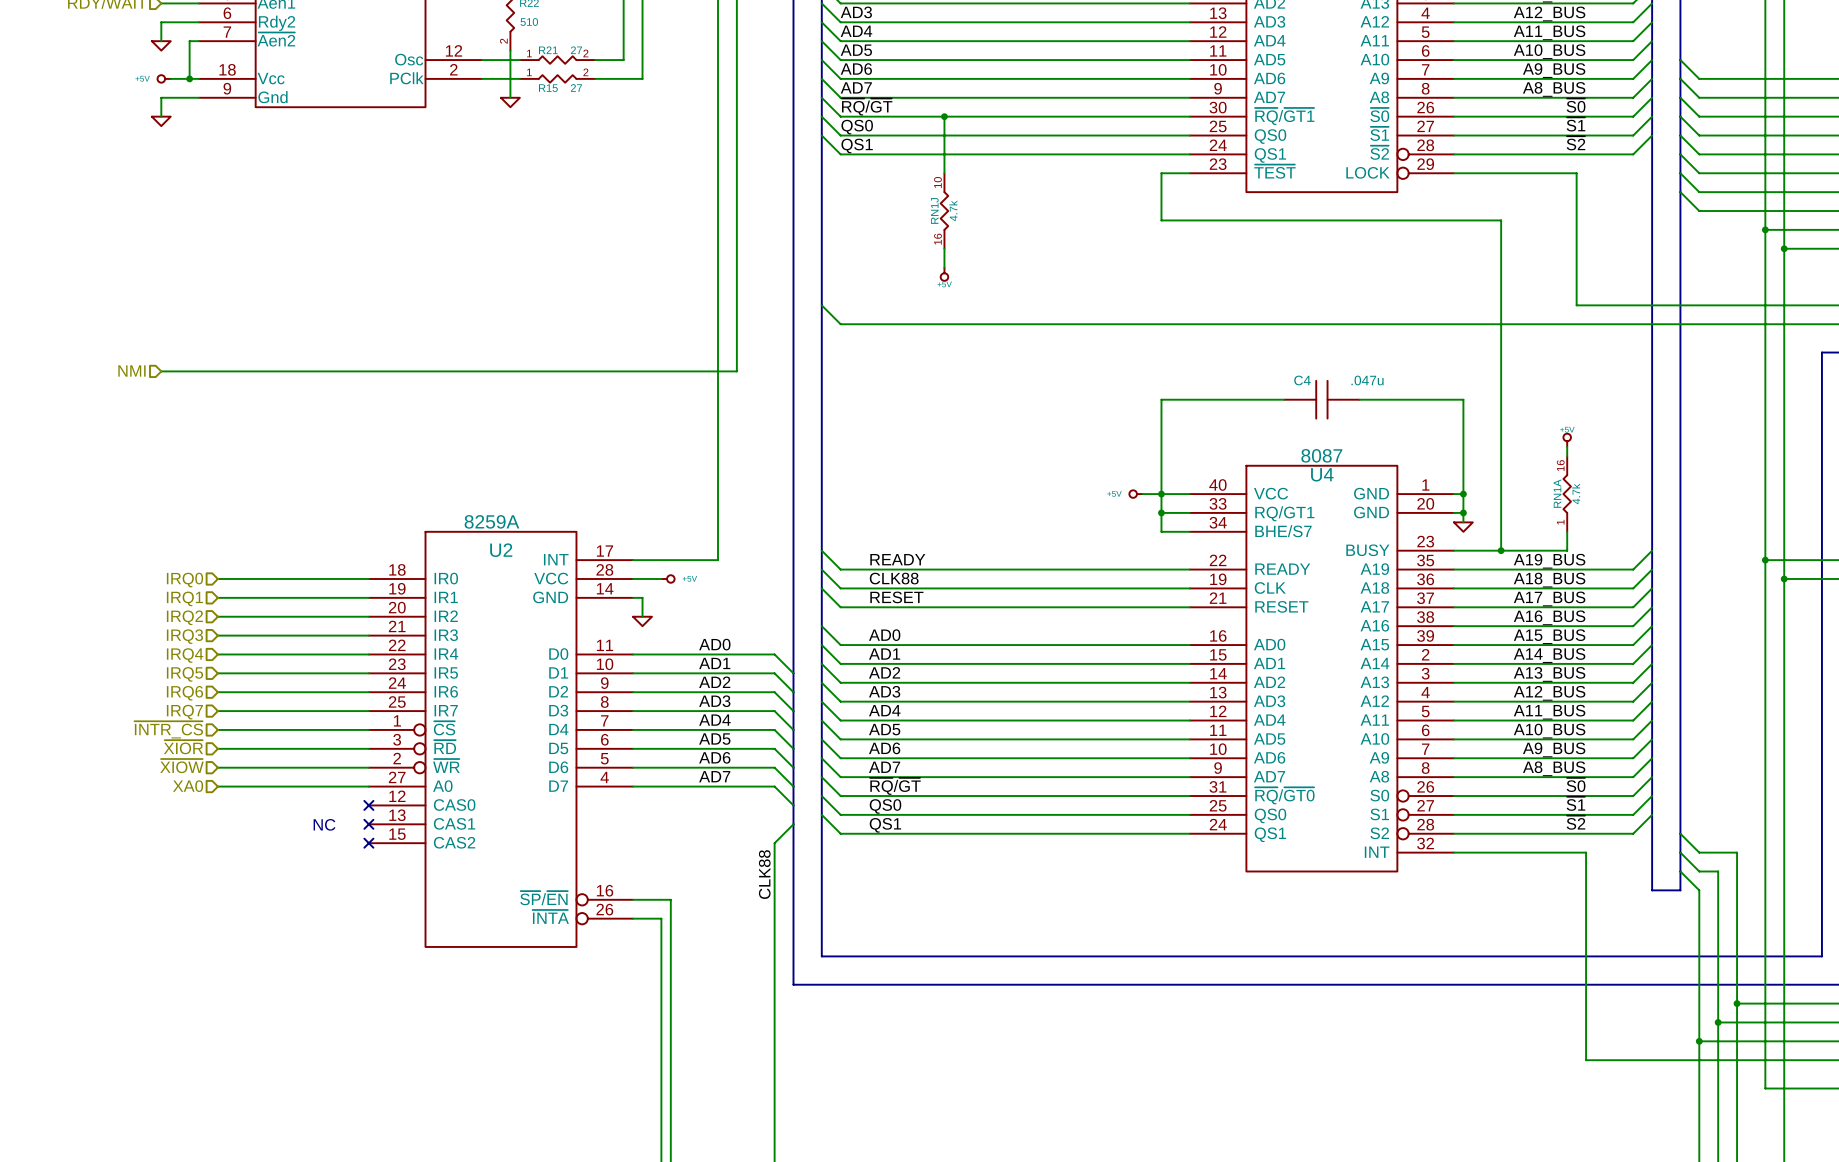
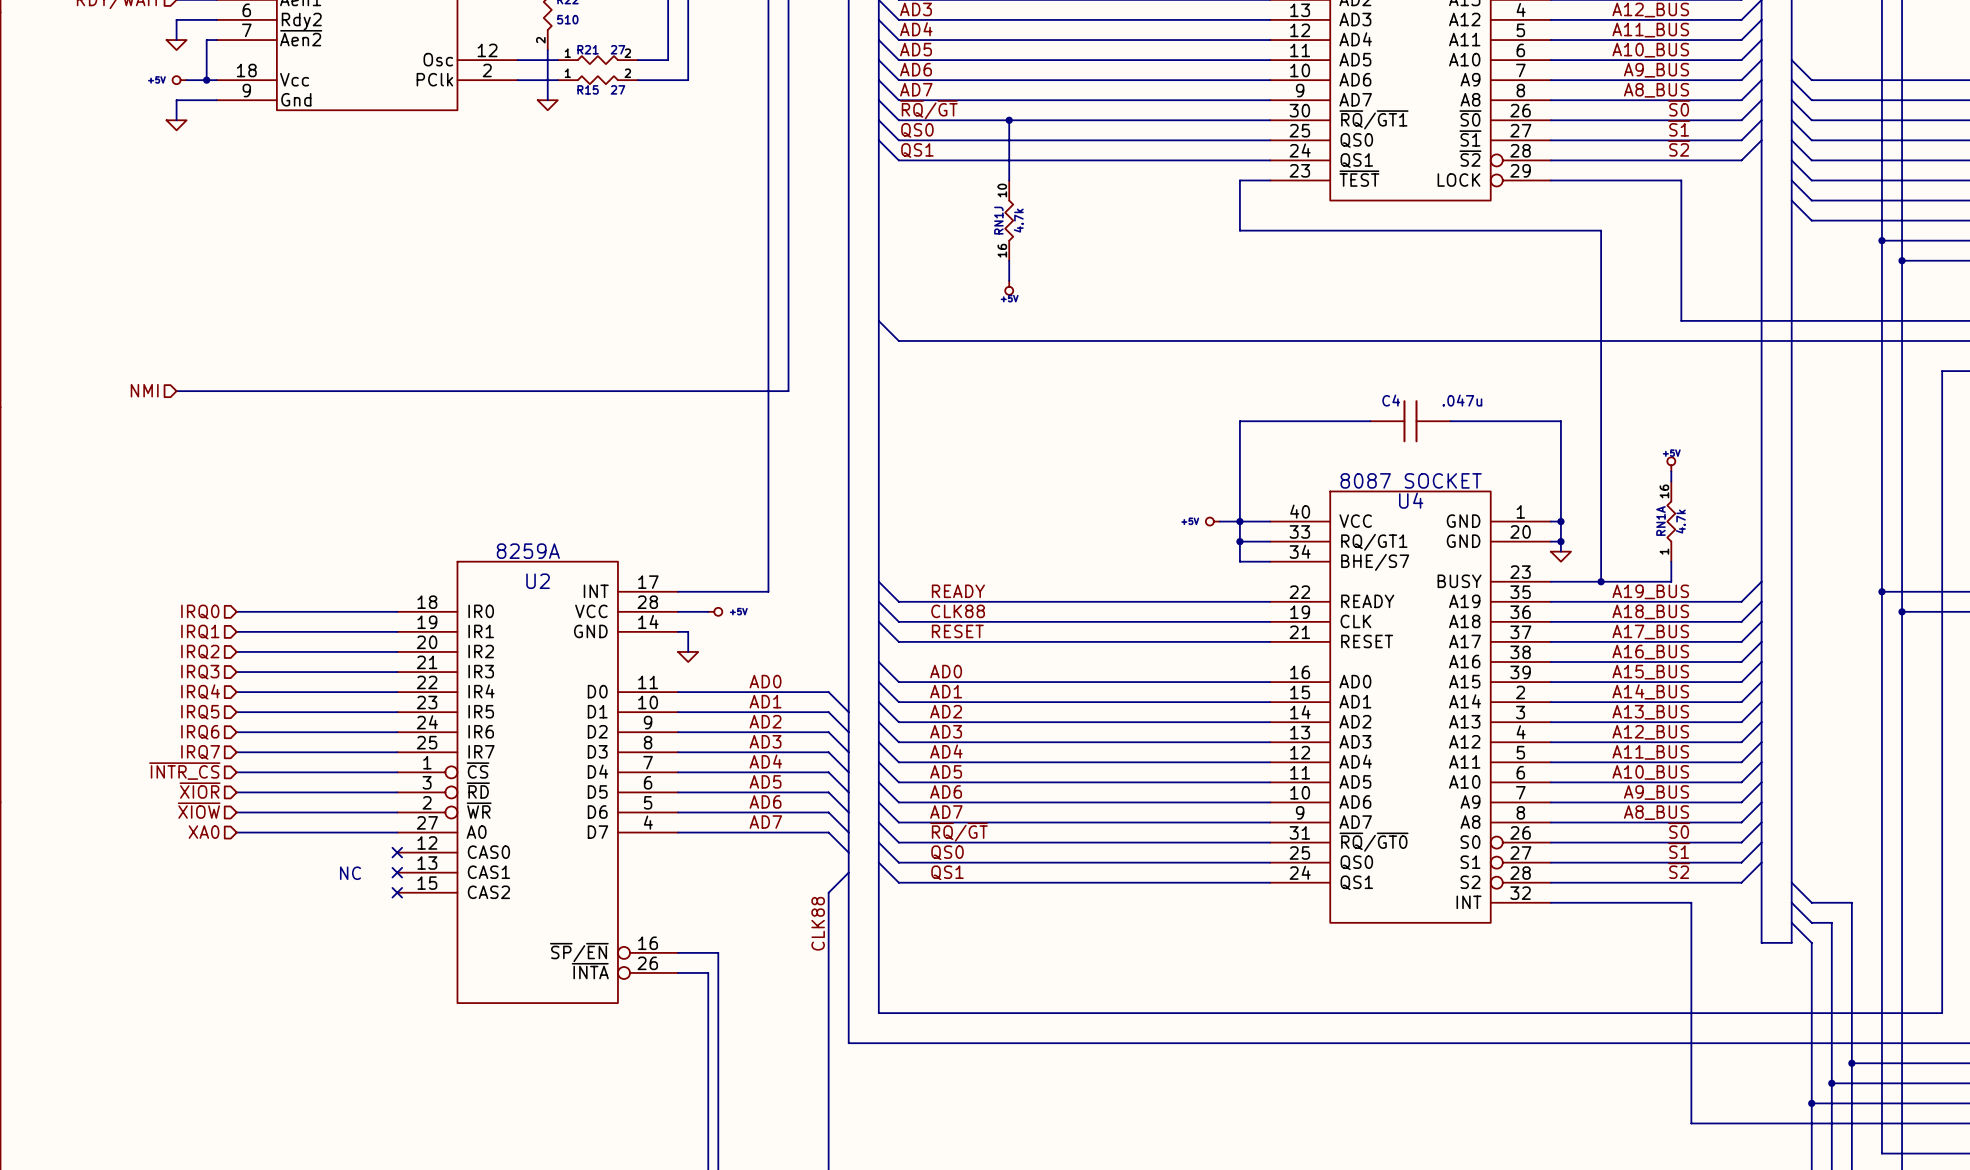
U4 value: 8087 (1321, 455) -> 8087 SOCKET (1411, 480)

